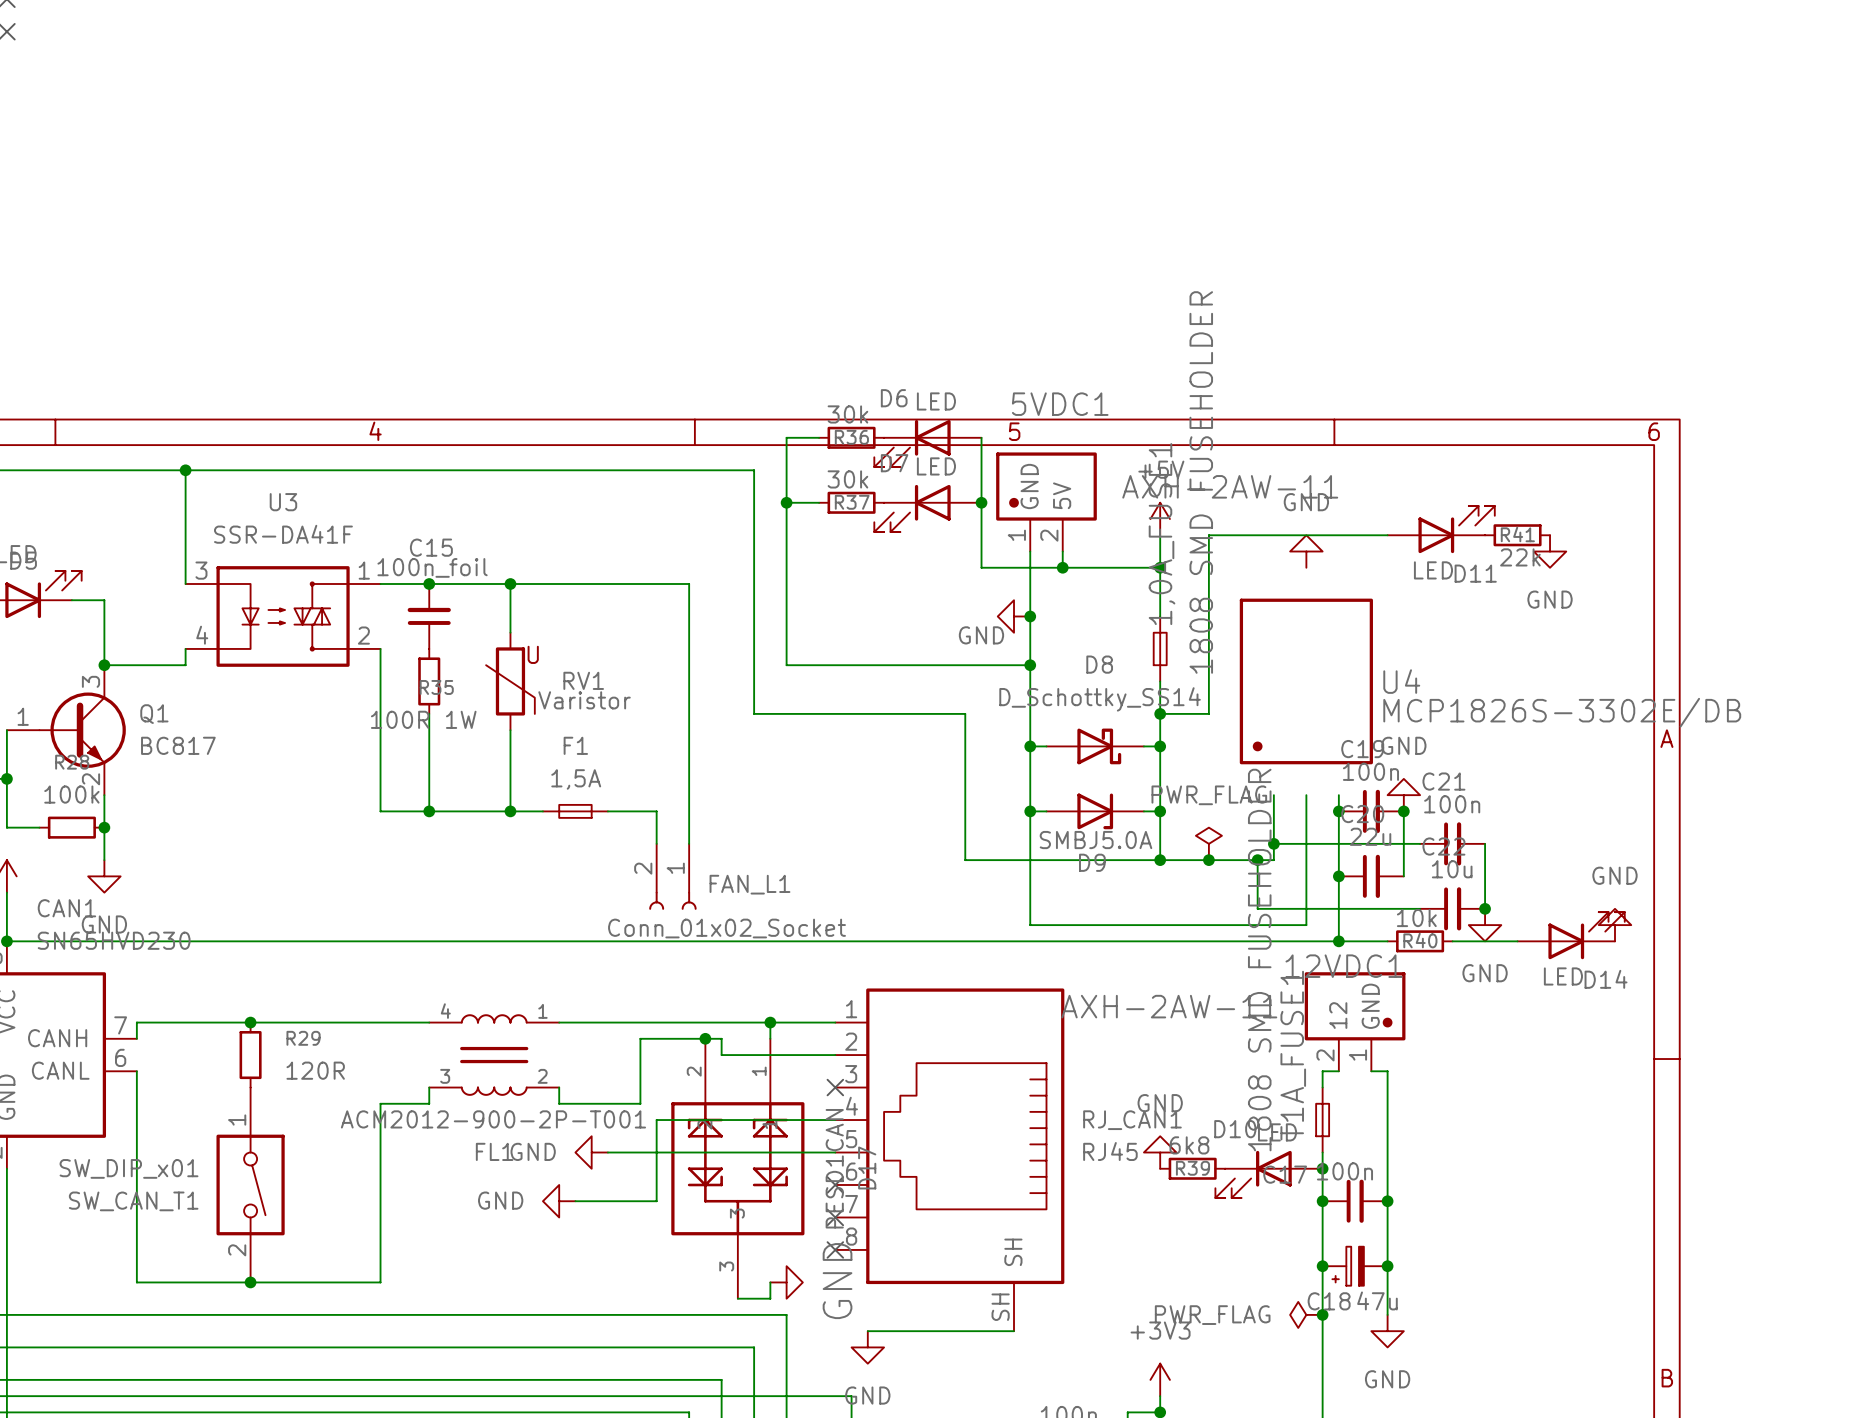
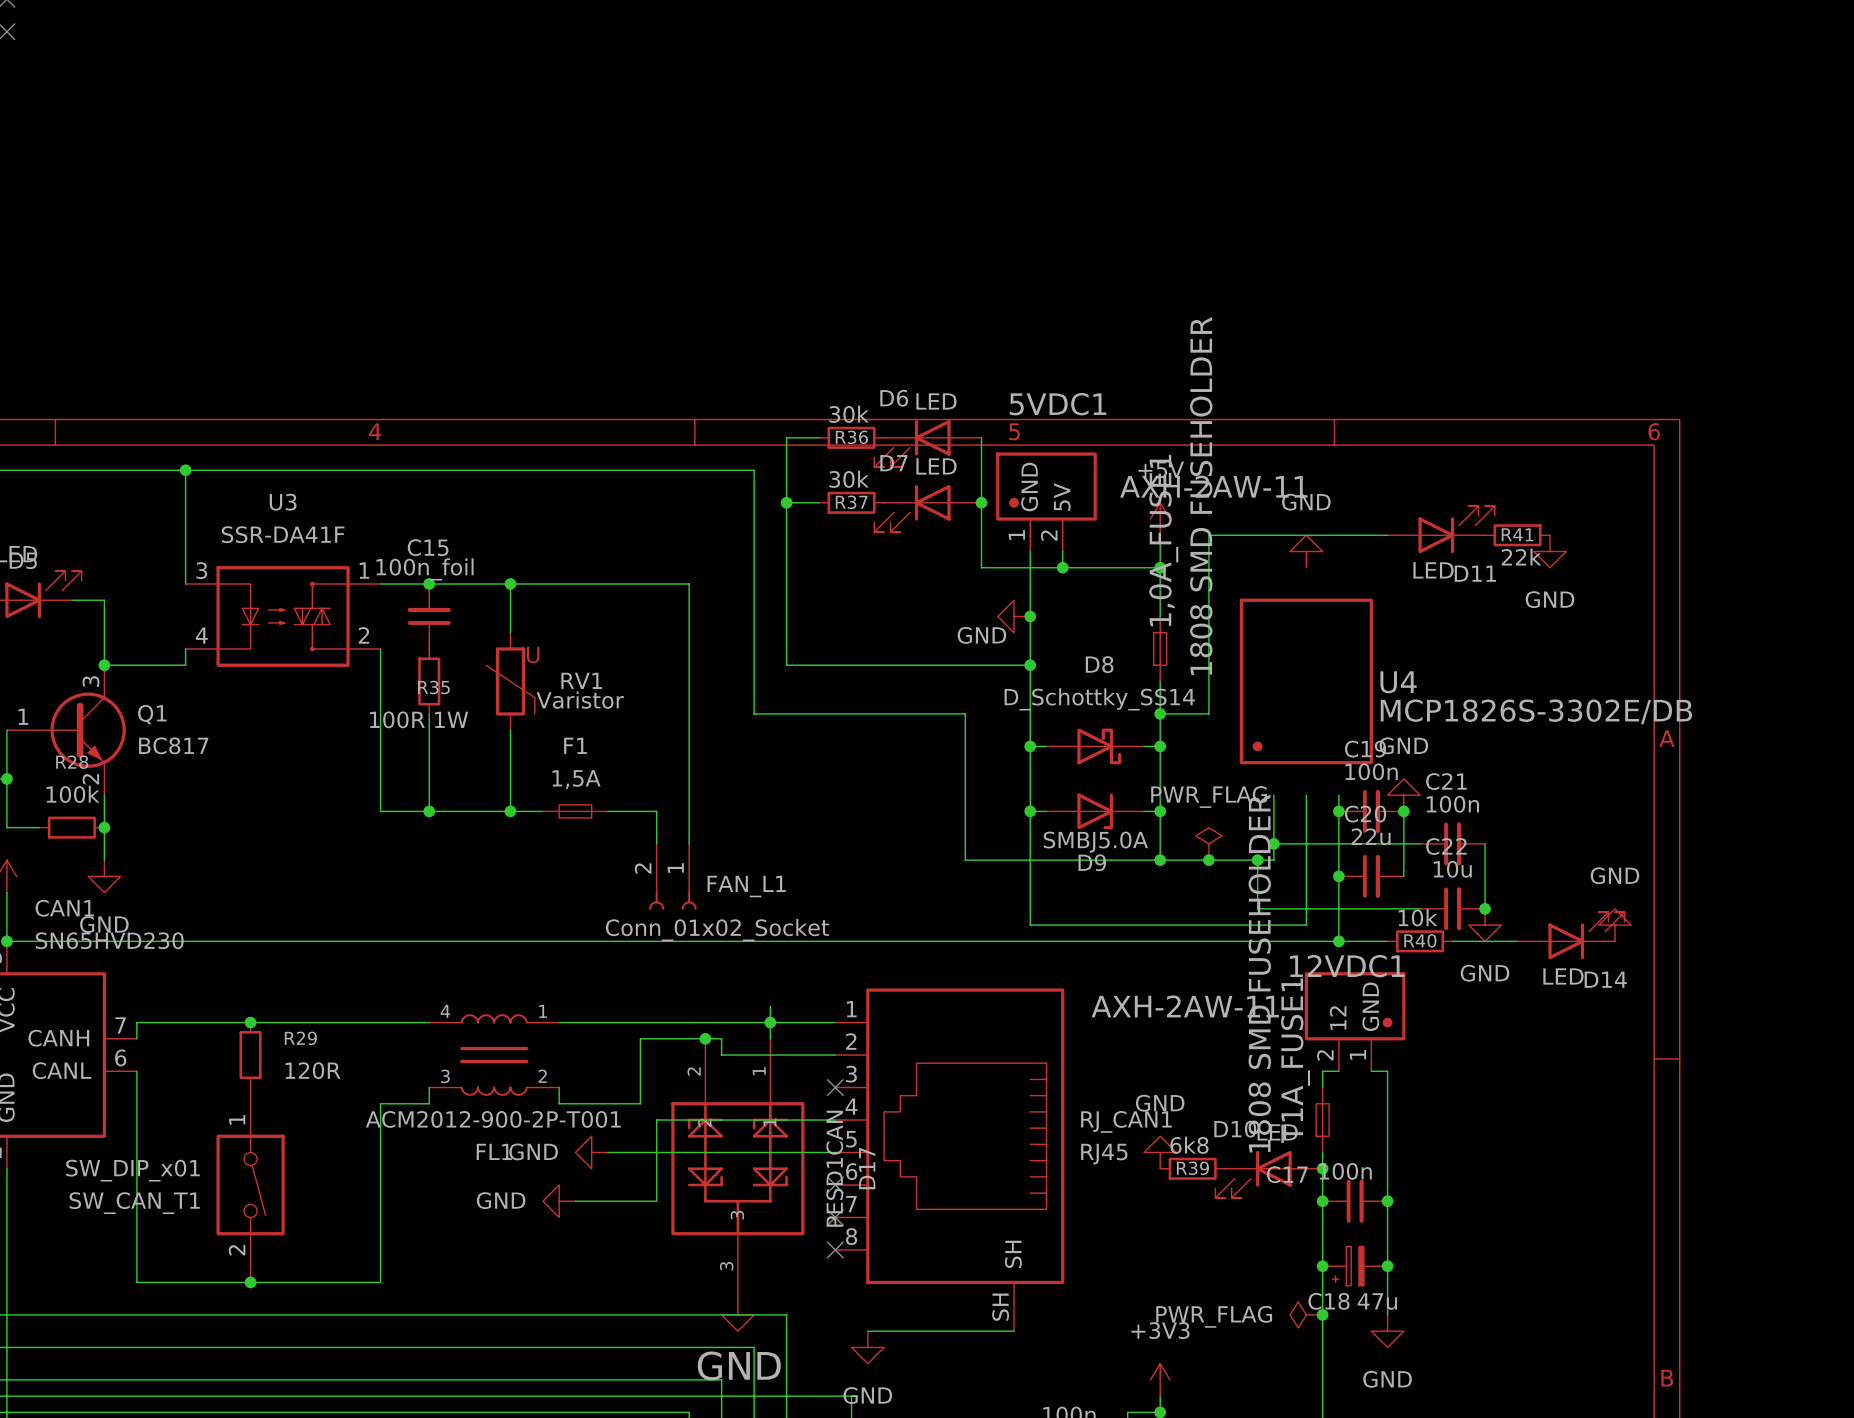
wire: none -> (770, 1006) (770, 1022)
wire: (770, 1282) (770, 1298) (737, 1298) -> none
power symbol rotation: 0° (786, 1282) -> 90° clockwise (737, 1314)
power symbol position: GND (786, 1282) -> GND (737, 1314)

